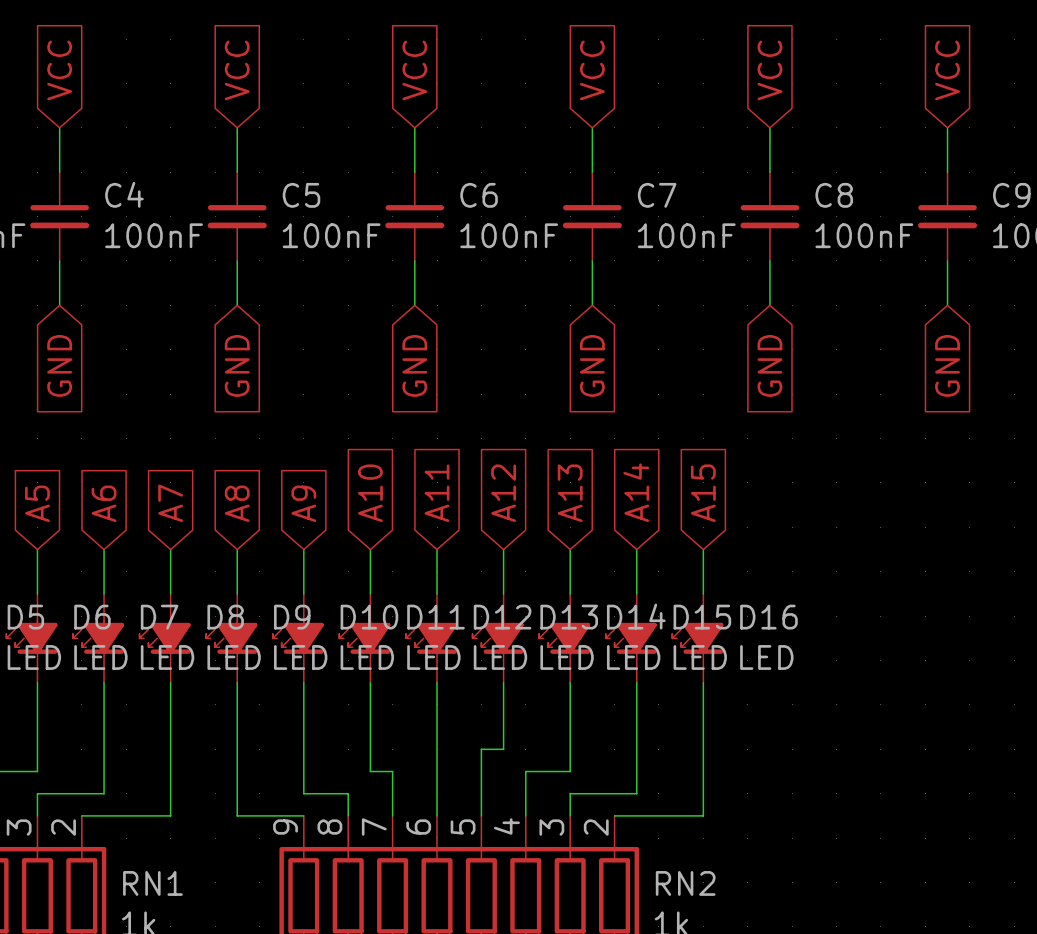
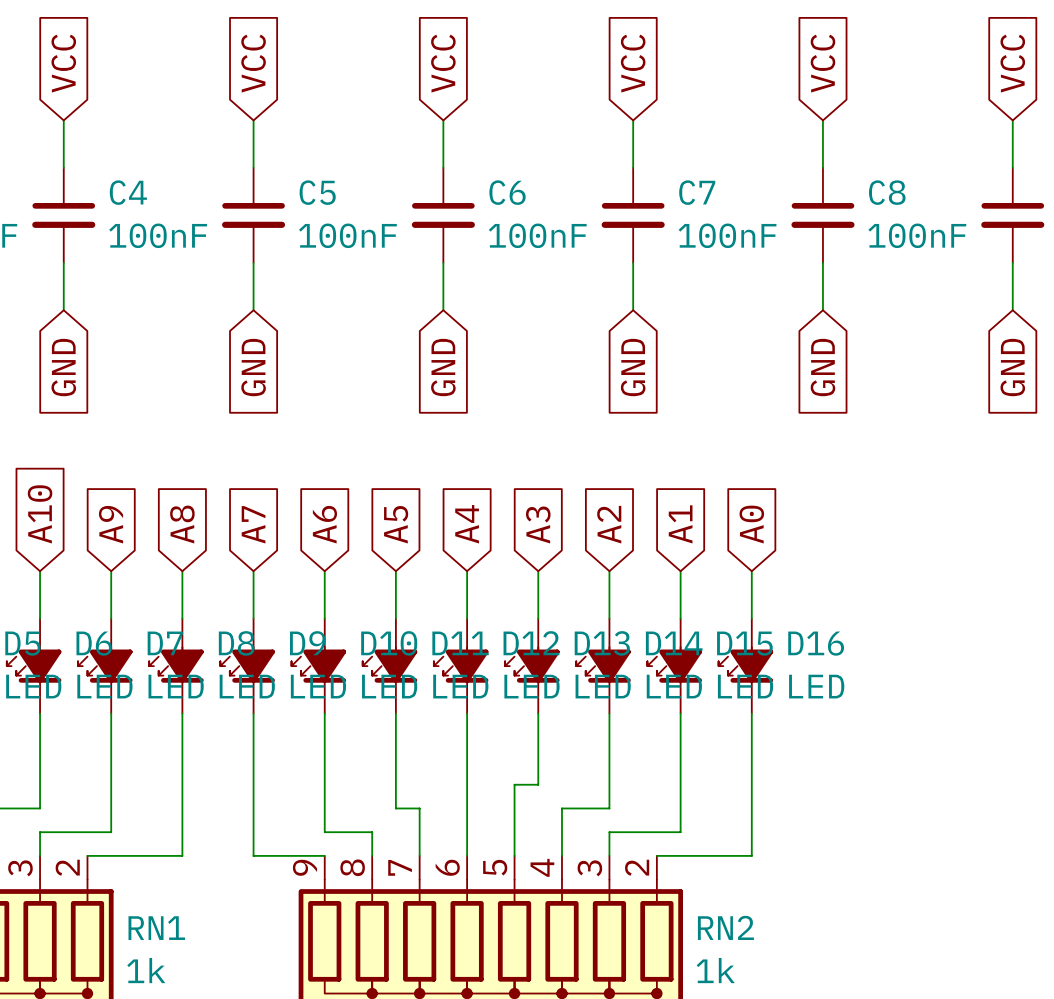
global label: A14 (636, 492) -> A1 (680, 524)
global label: A10 (370, 493) -> A5 (396, 524)
global label: A11 (437, 493) -> A4 (467, 524)
global label: A12 (503, 493) -> A3 (538, 525)
global label: A13 (570, 493) -> A2 (609, 524)
global label: A15 (703, 493) -> A0 (751, 524)
global label: A5 (37, 503) -> A10 (40, 514)
global label: A6 (104, 503) -> A9 (111, 524)
global label: A7 (170, 503) -> A8 (182, 524)
global label: A8 (237, 503) -> A7 (253, 524)
global label: A9 (303, 503) -> A6 (324, 524)

